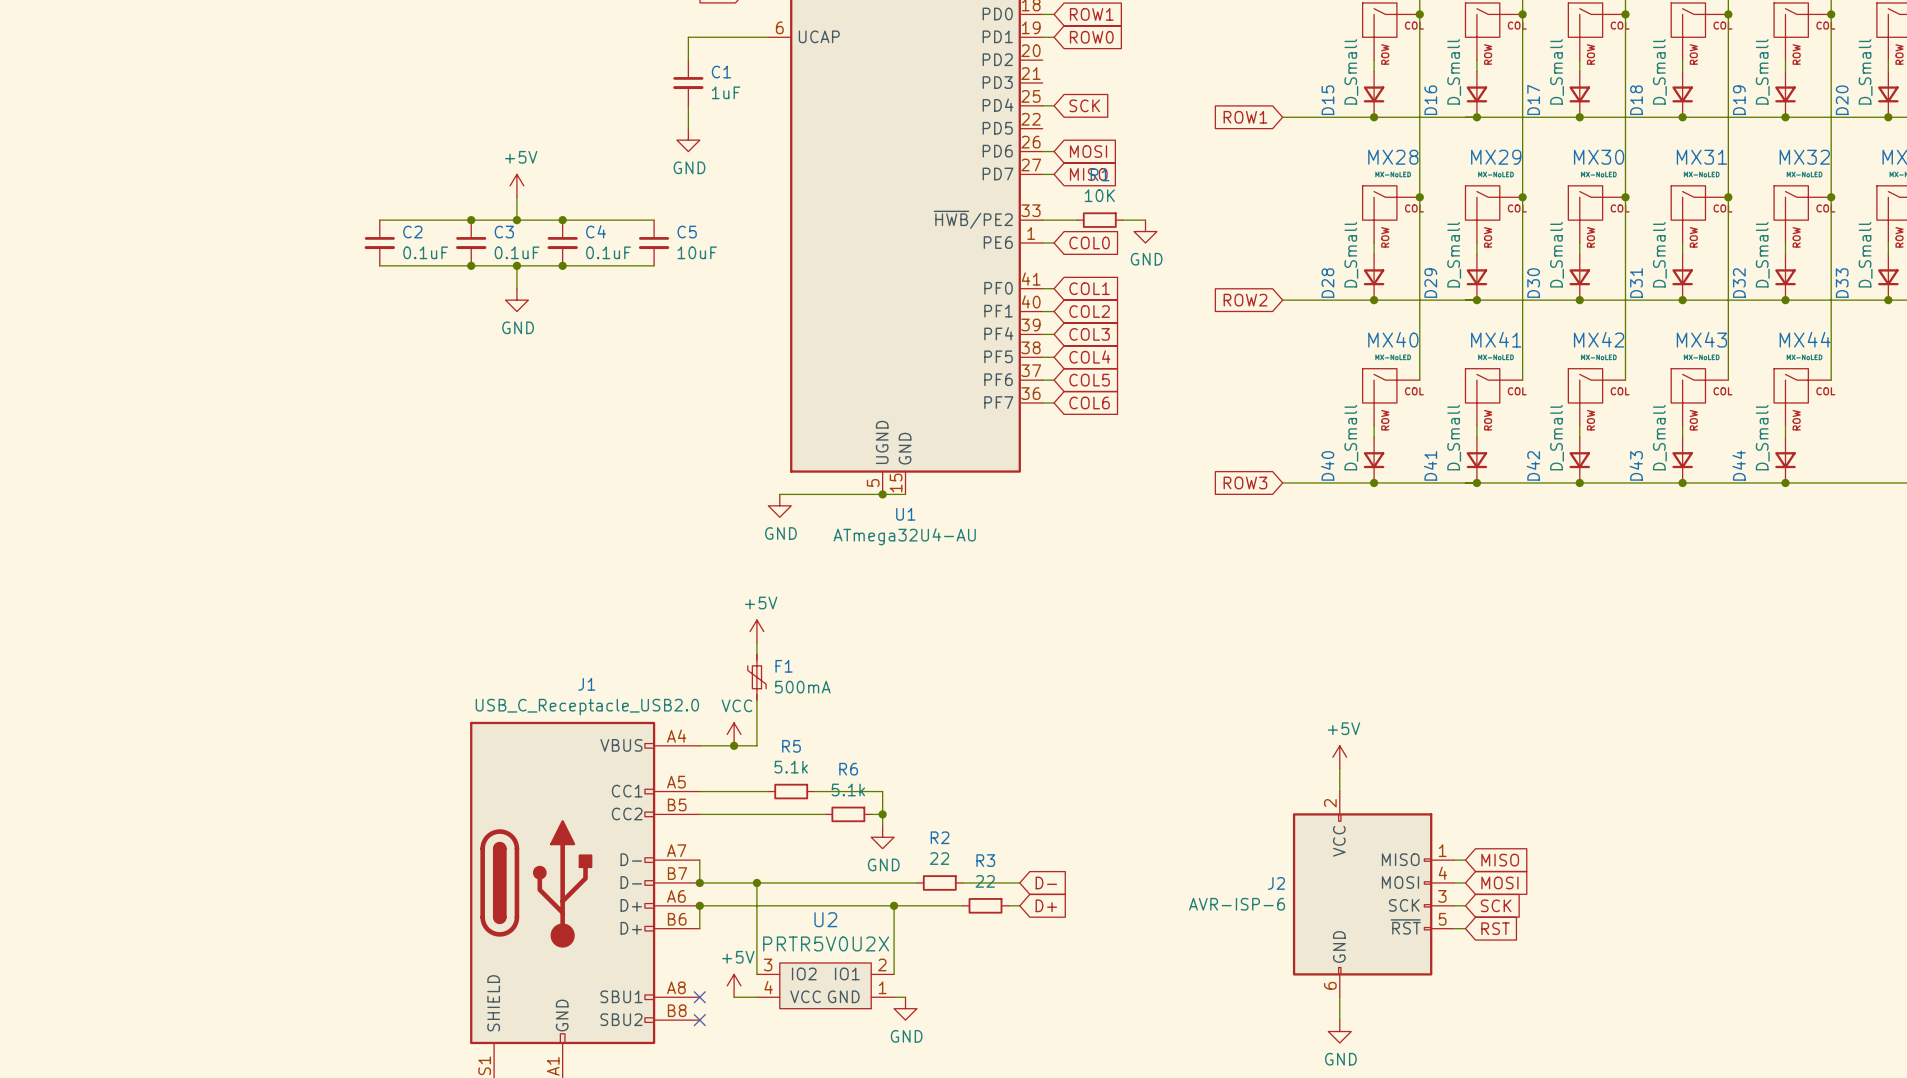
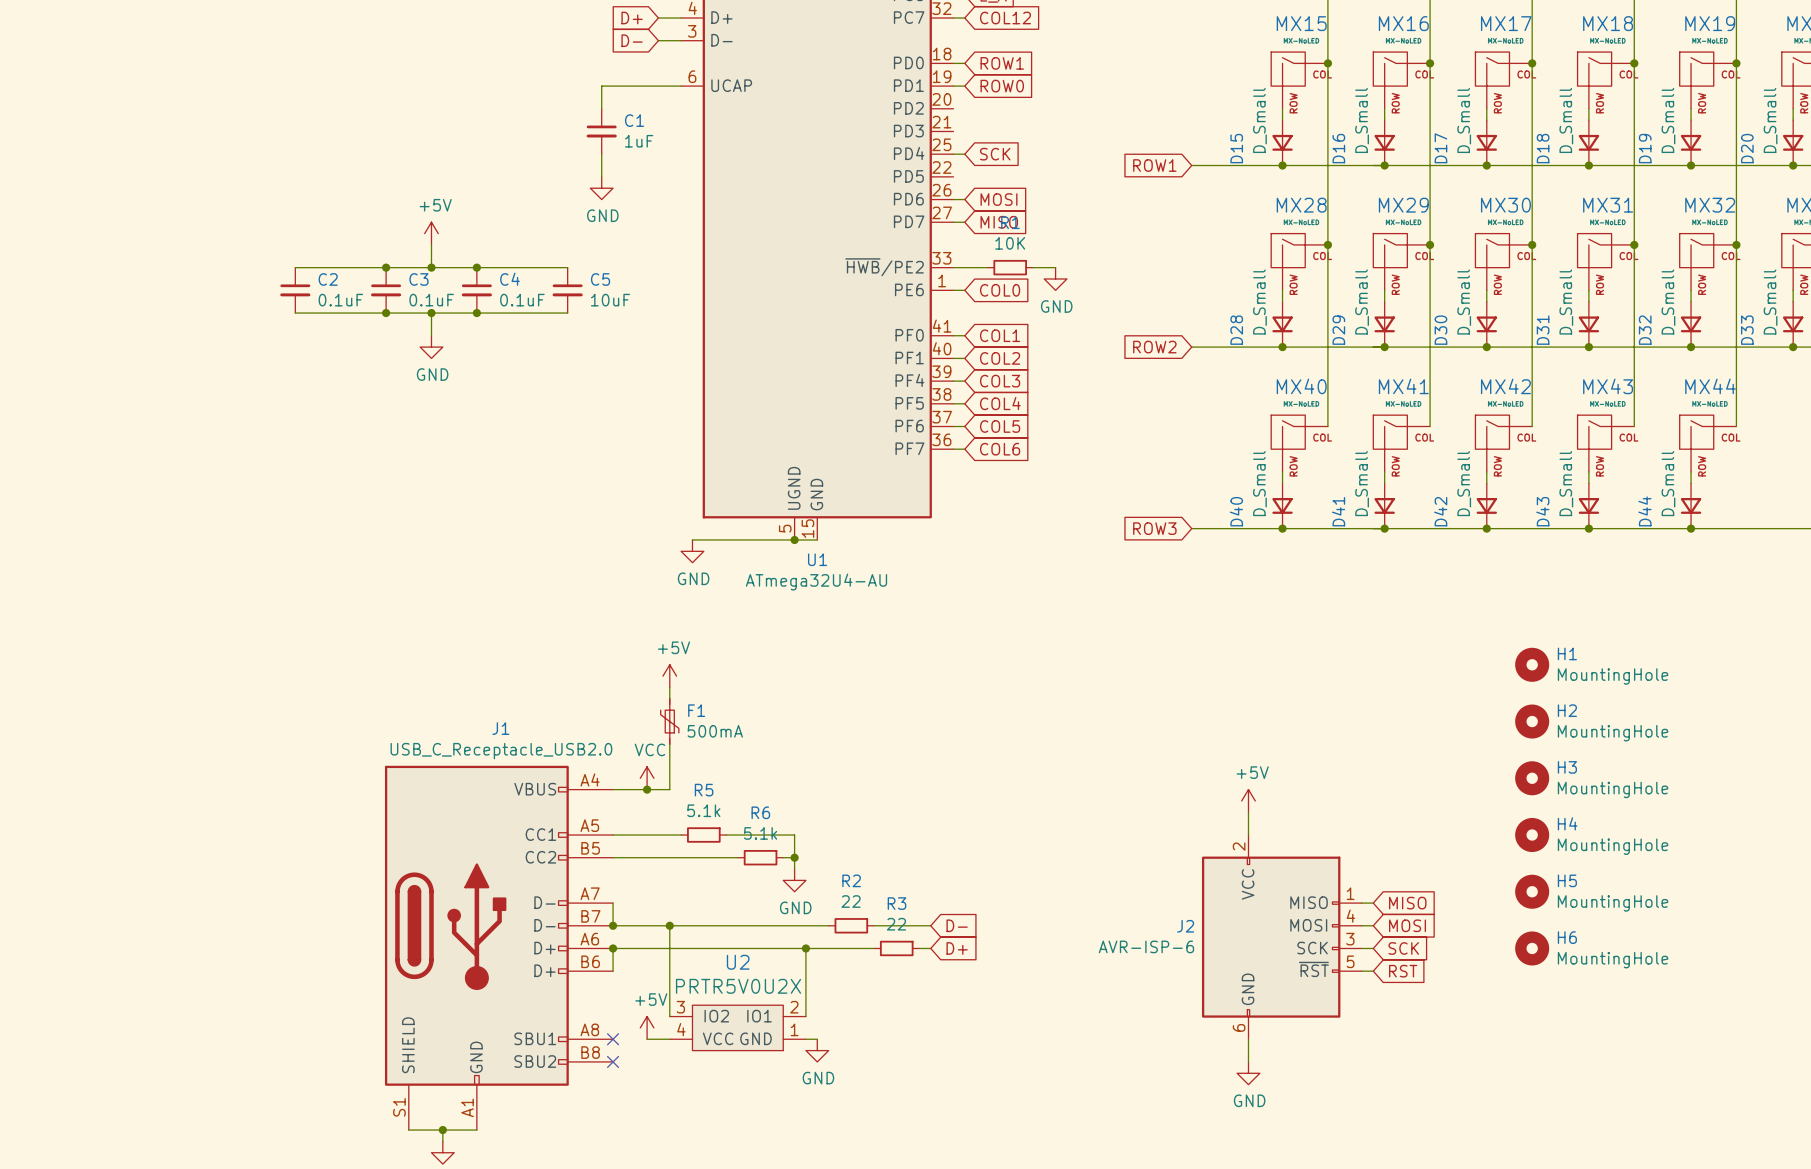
H1: none -> MountingHole (1532, 664)
H2: none -> MountingHole (1532, 721)
H3: none -> MountingHole (1532, 778)
H4: none -> MountingHole (1532, 835)
H5: none -> MountingHole (1532, 891)
H6: none -> MountingHole (1532, 948)

